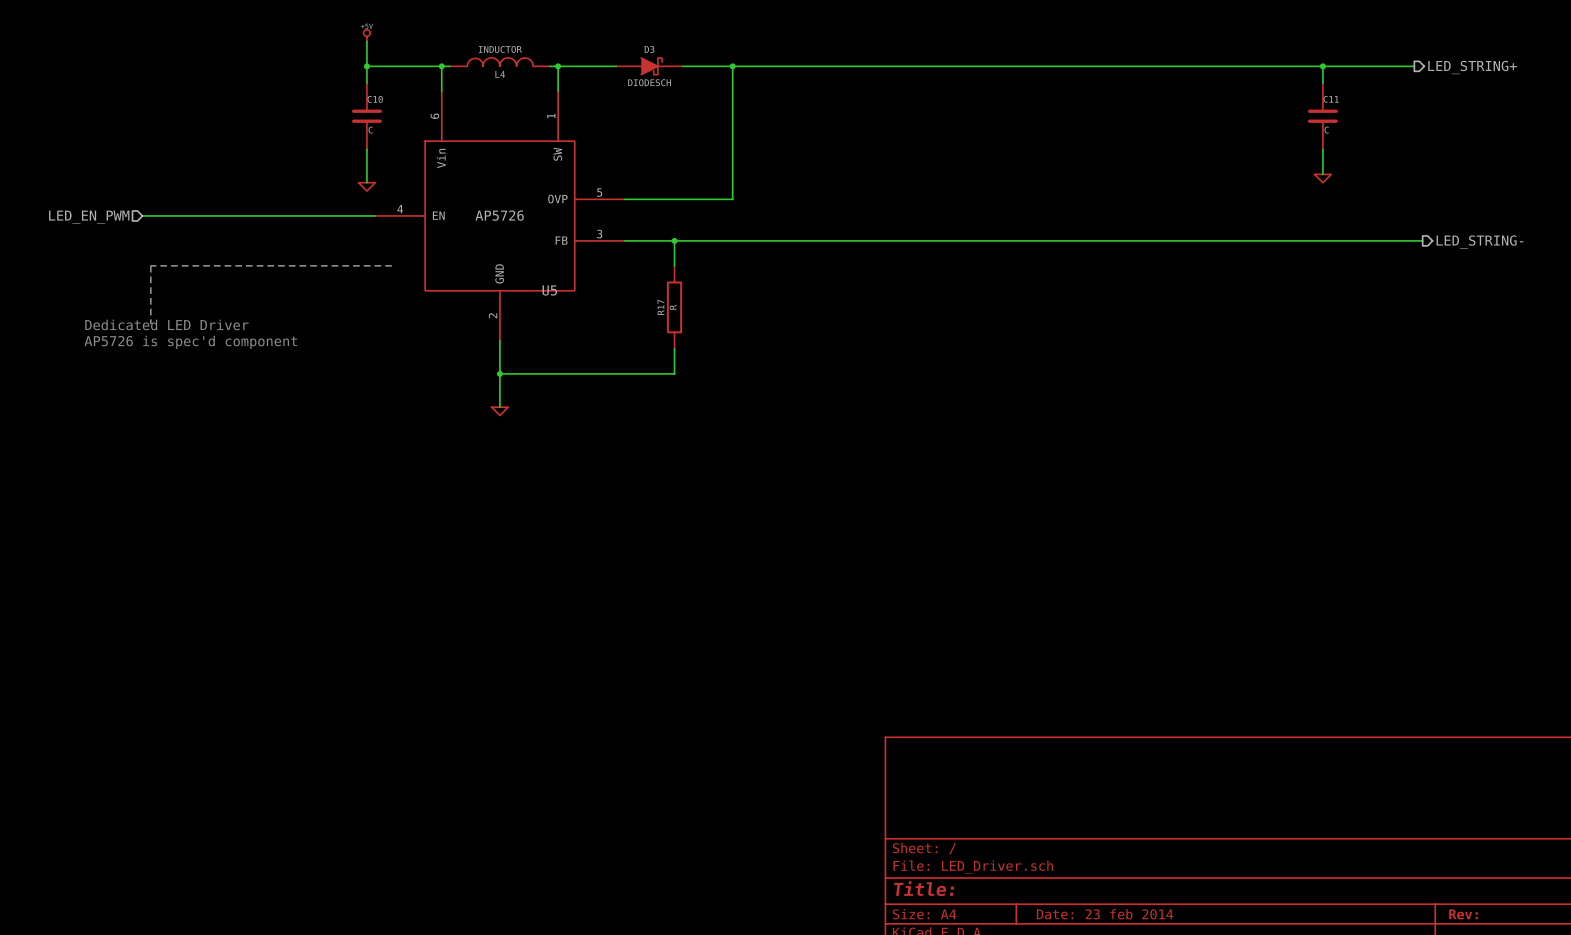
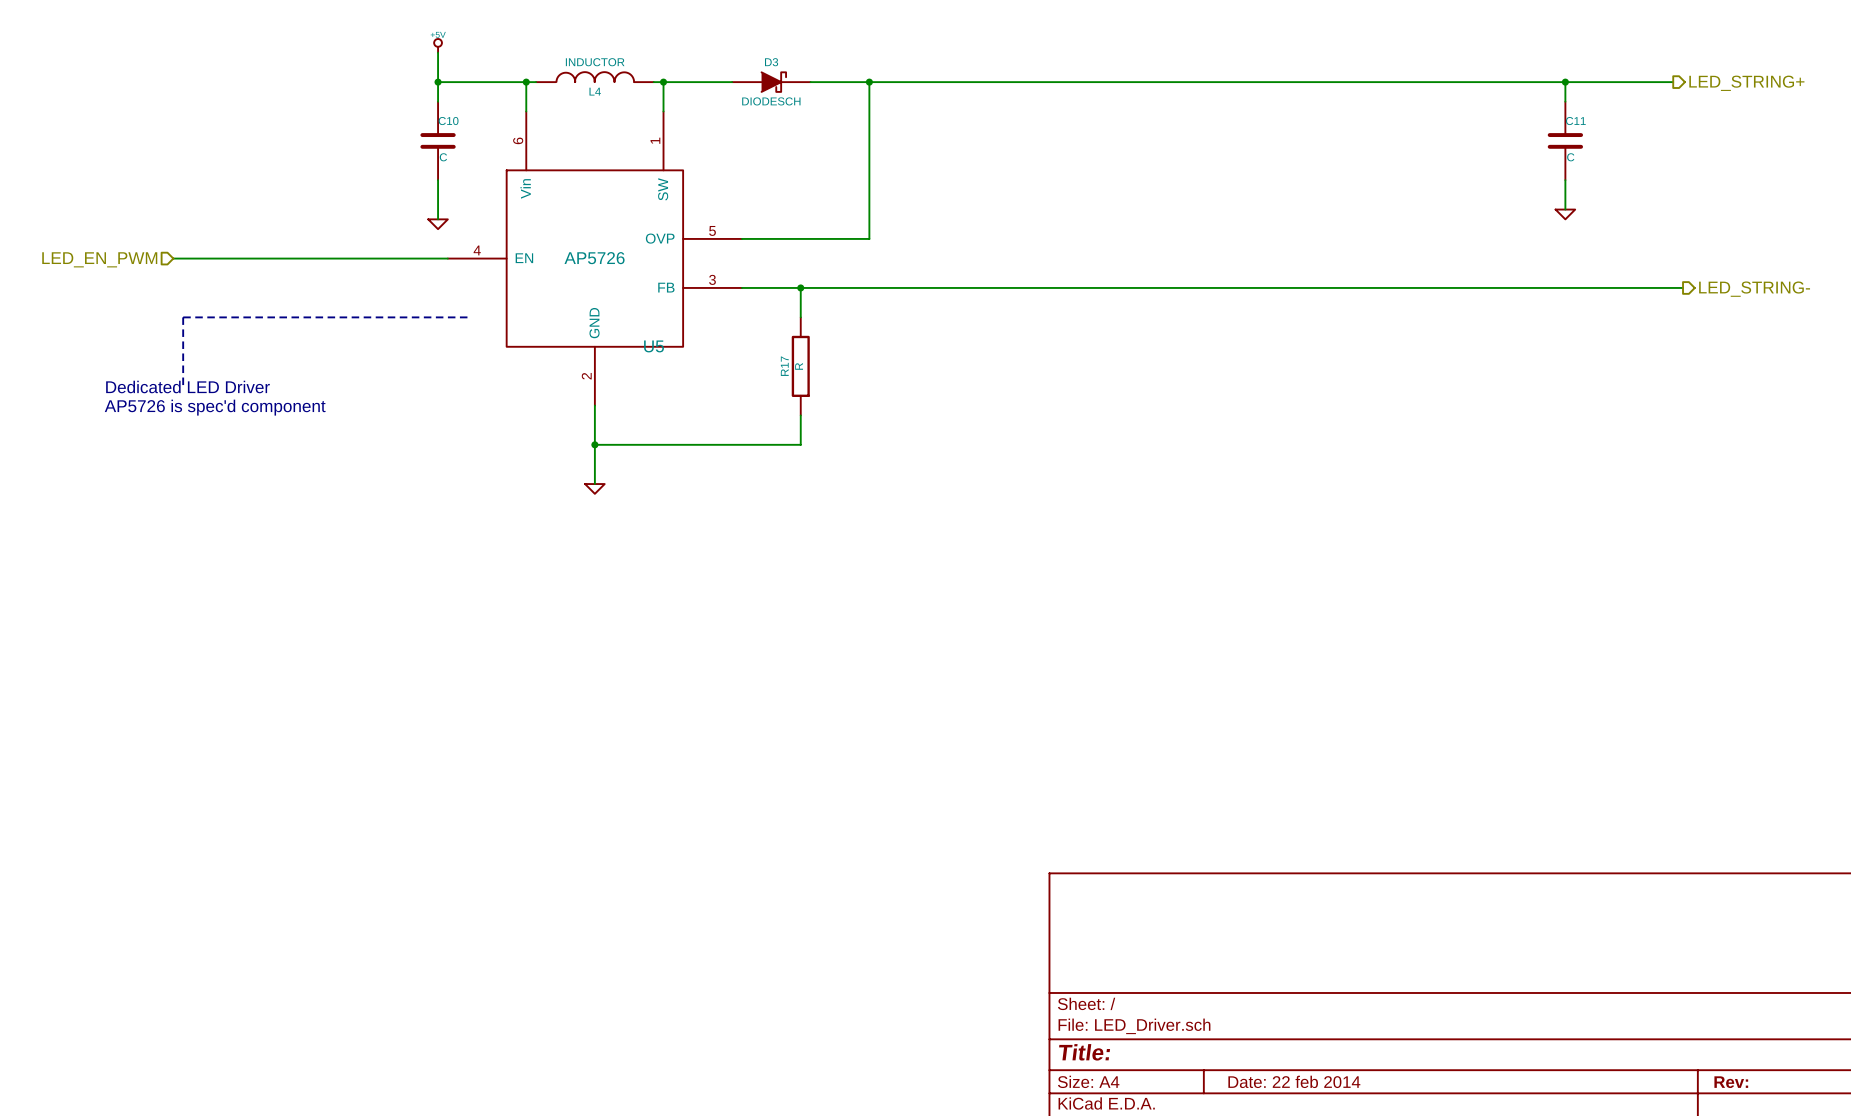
title block: Date: 23 feb 2014 (1105, 914) -> Date: 22 feb 2014 (1294, 1081)

